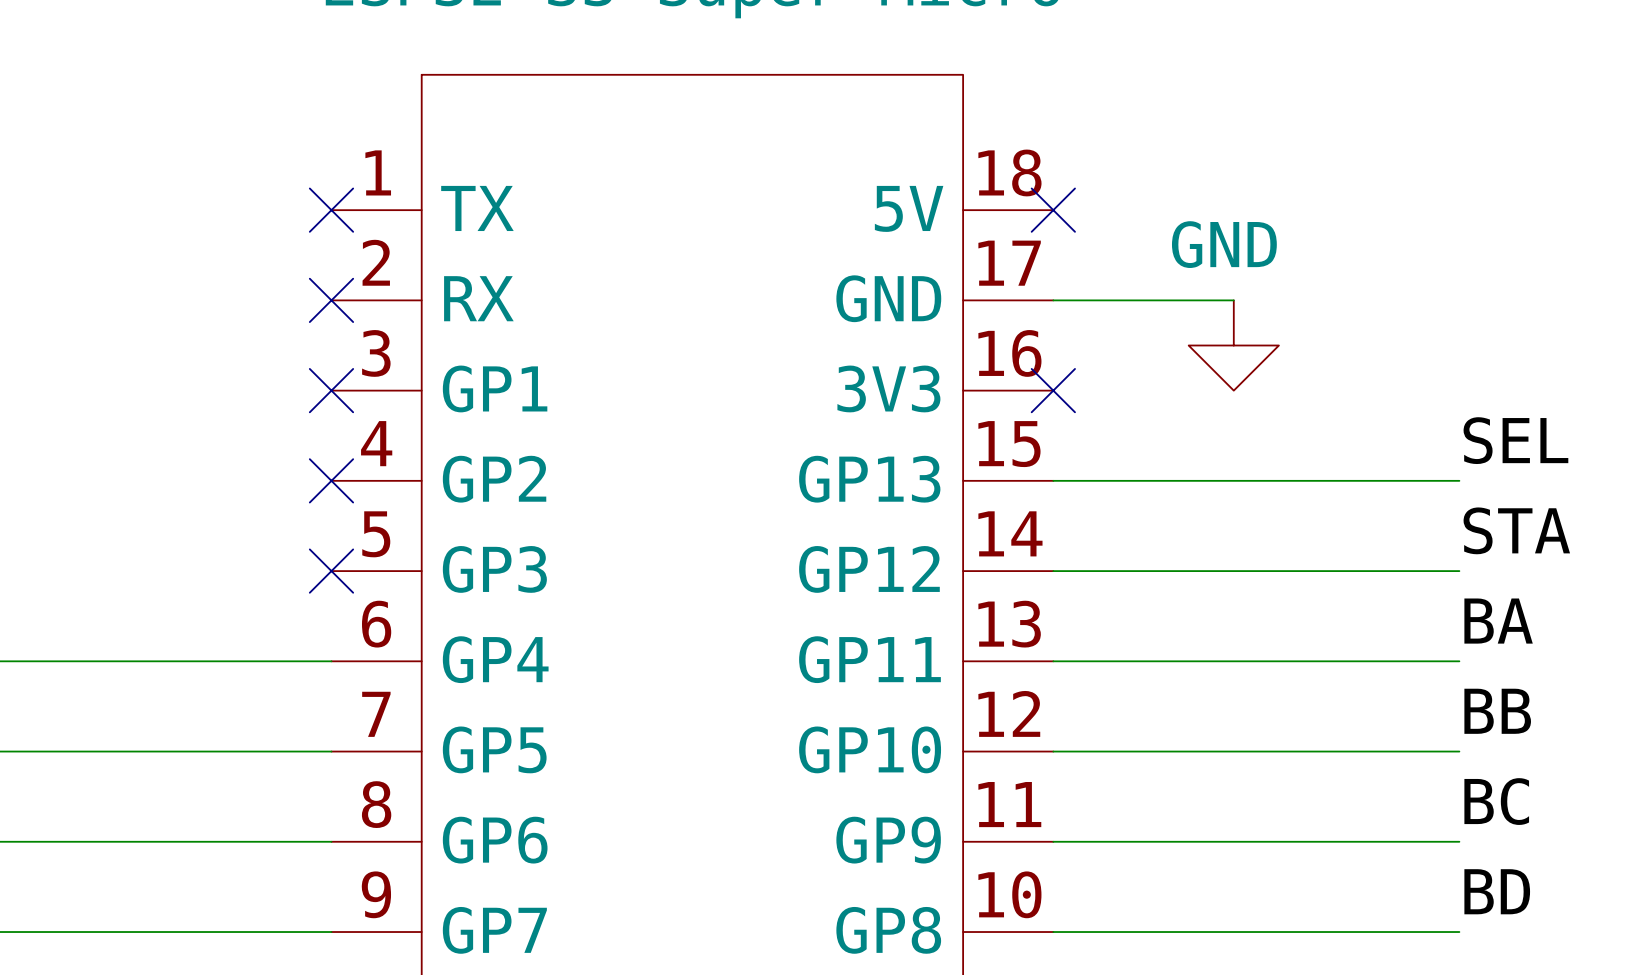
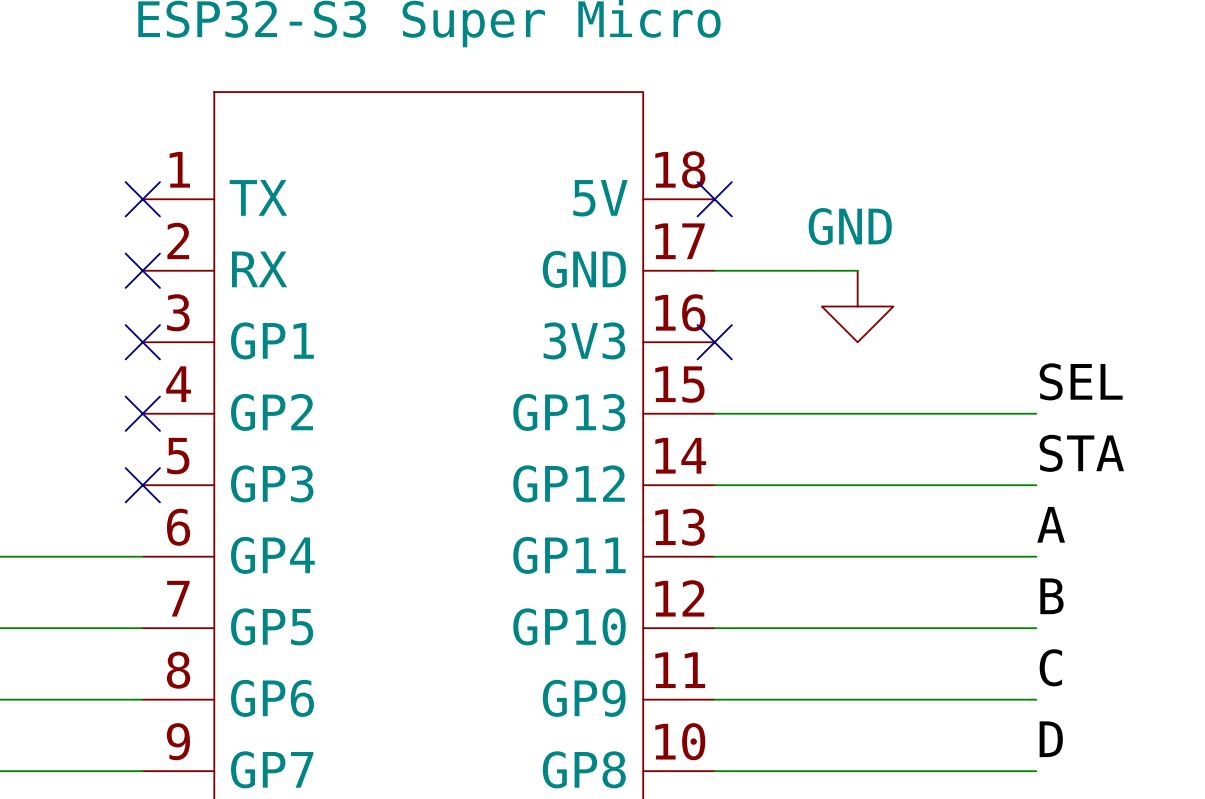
label: BA (1498, 621) -> A (1051, 524)
label: BB (1497, 711) -> B (1051, 596)
label: BC (1496, 801) -> C (1050, 667)
label: BD (1497, 891) -> D (1051, 739)

